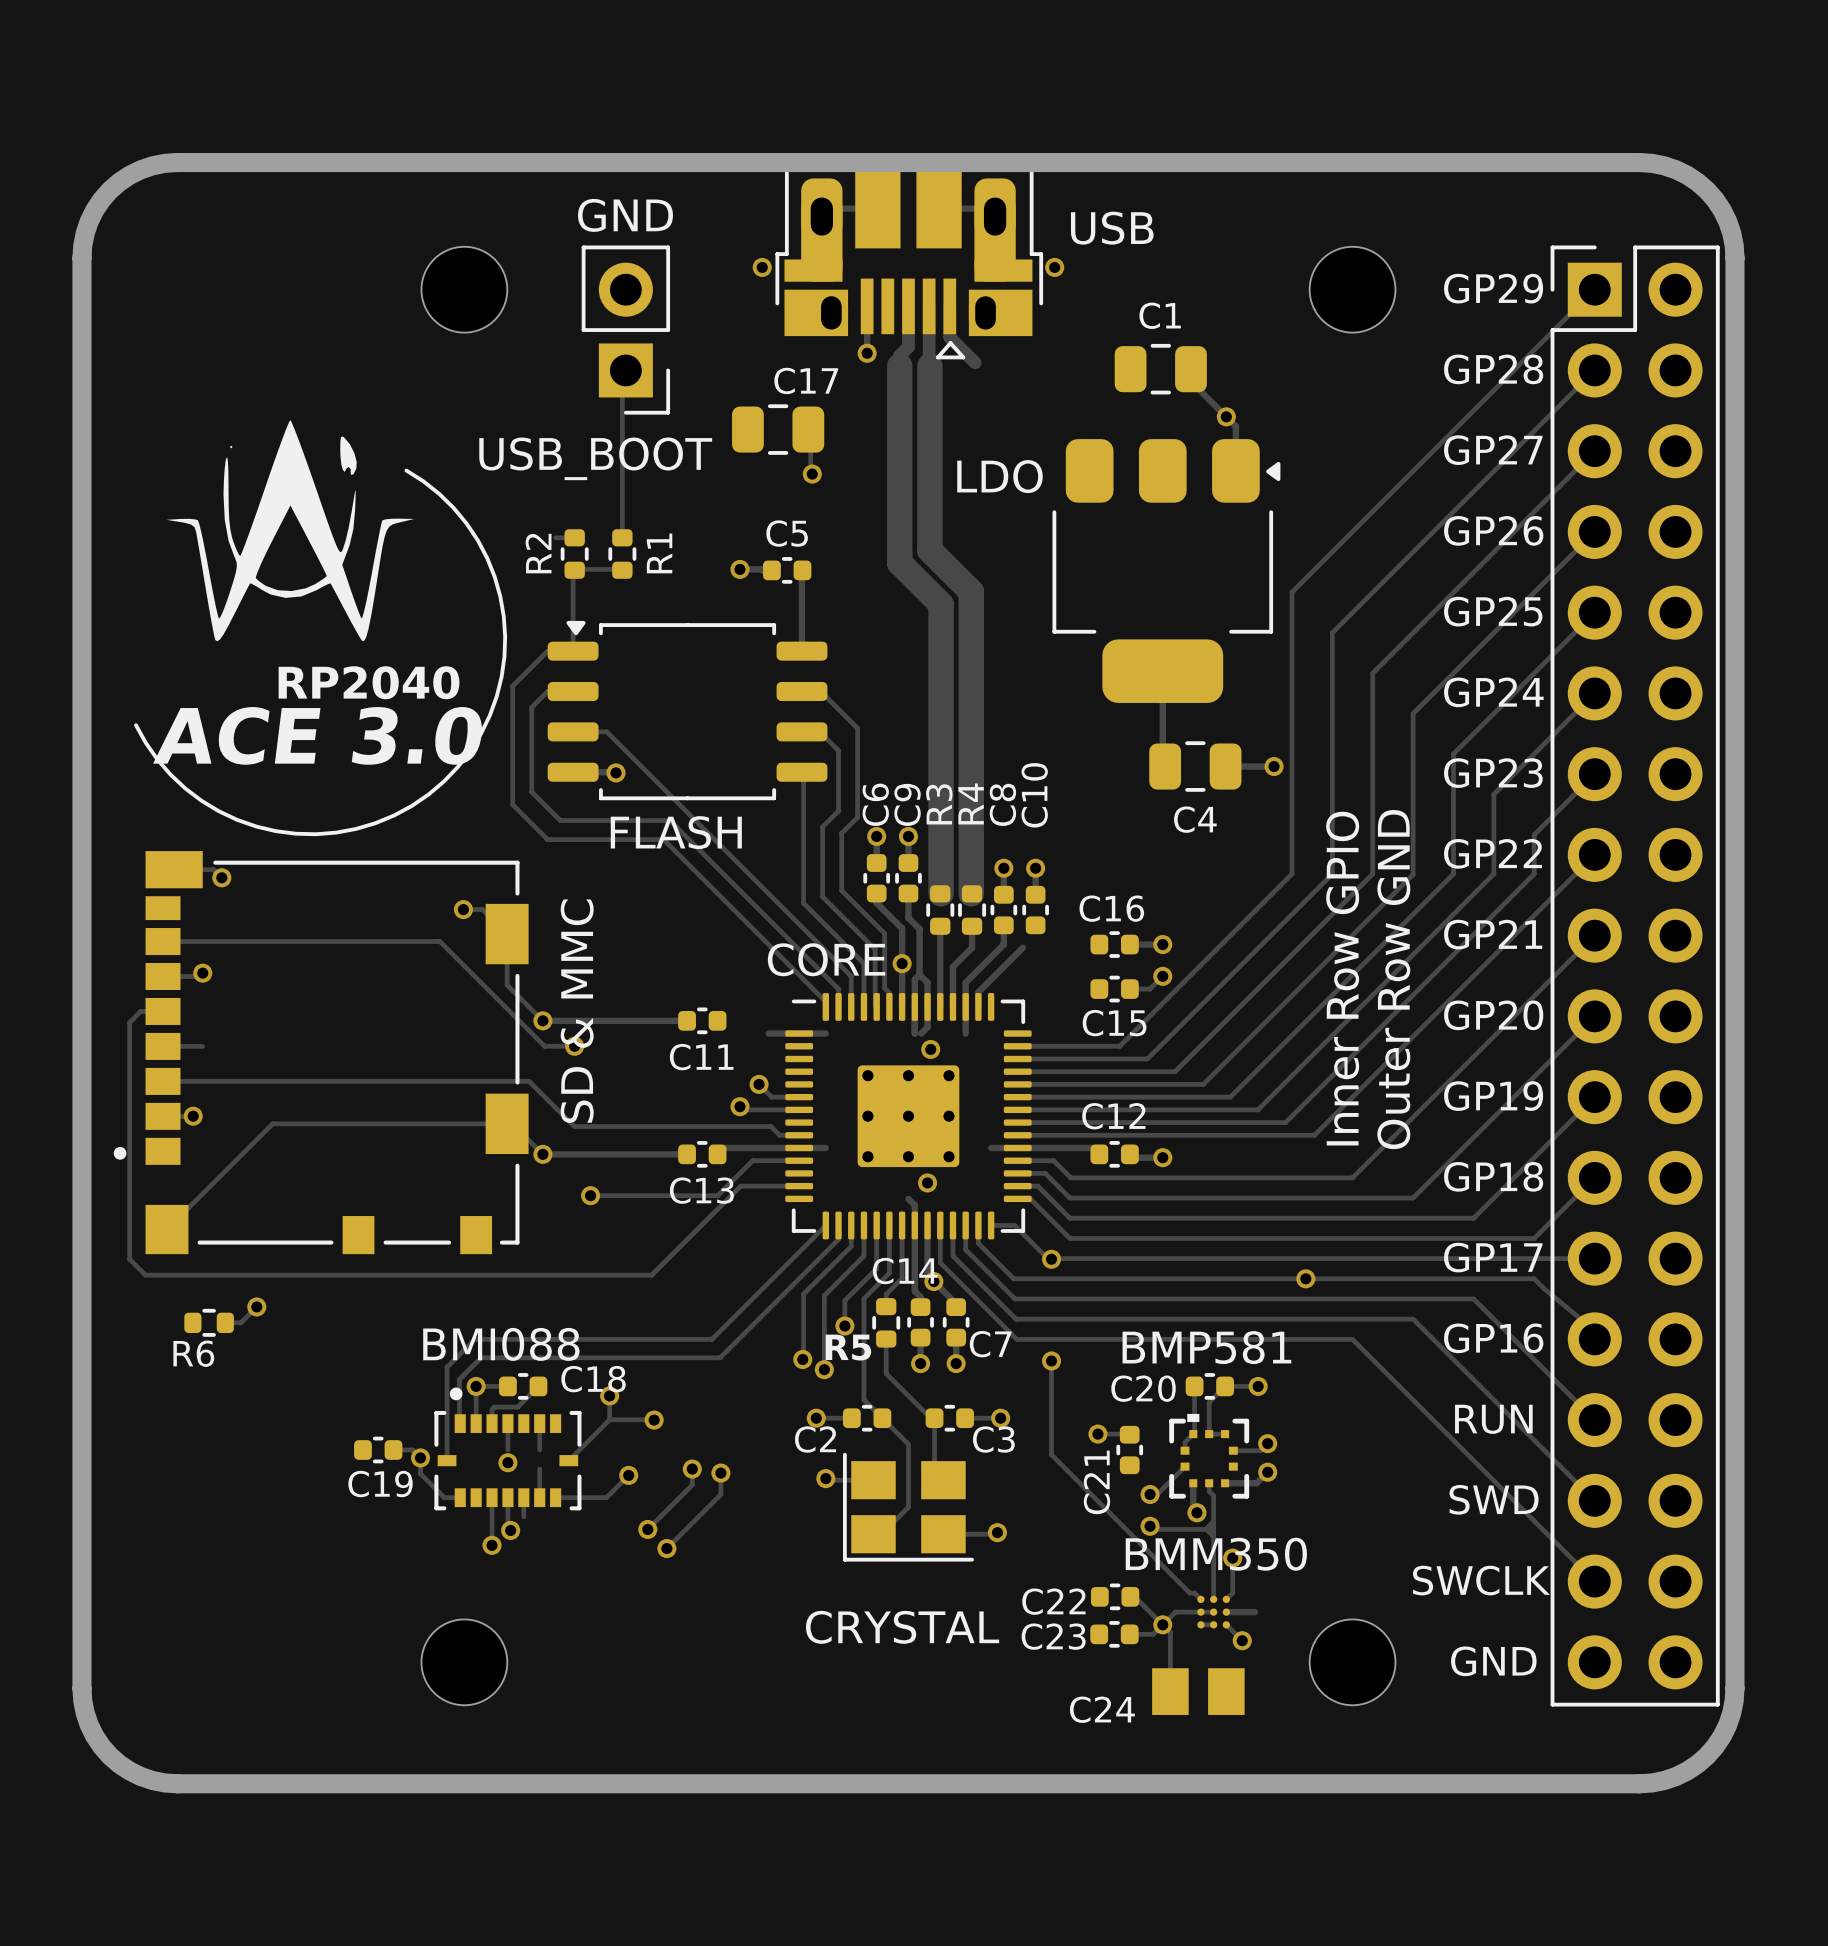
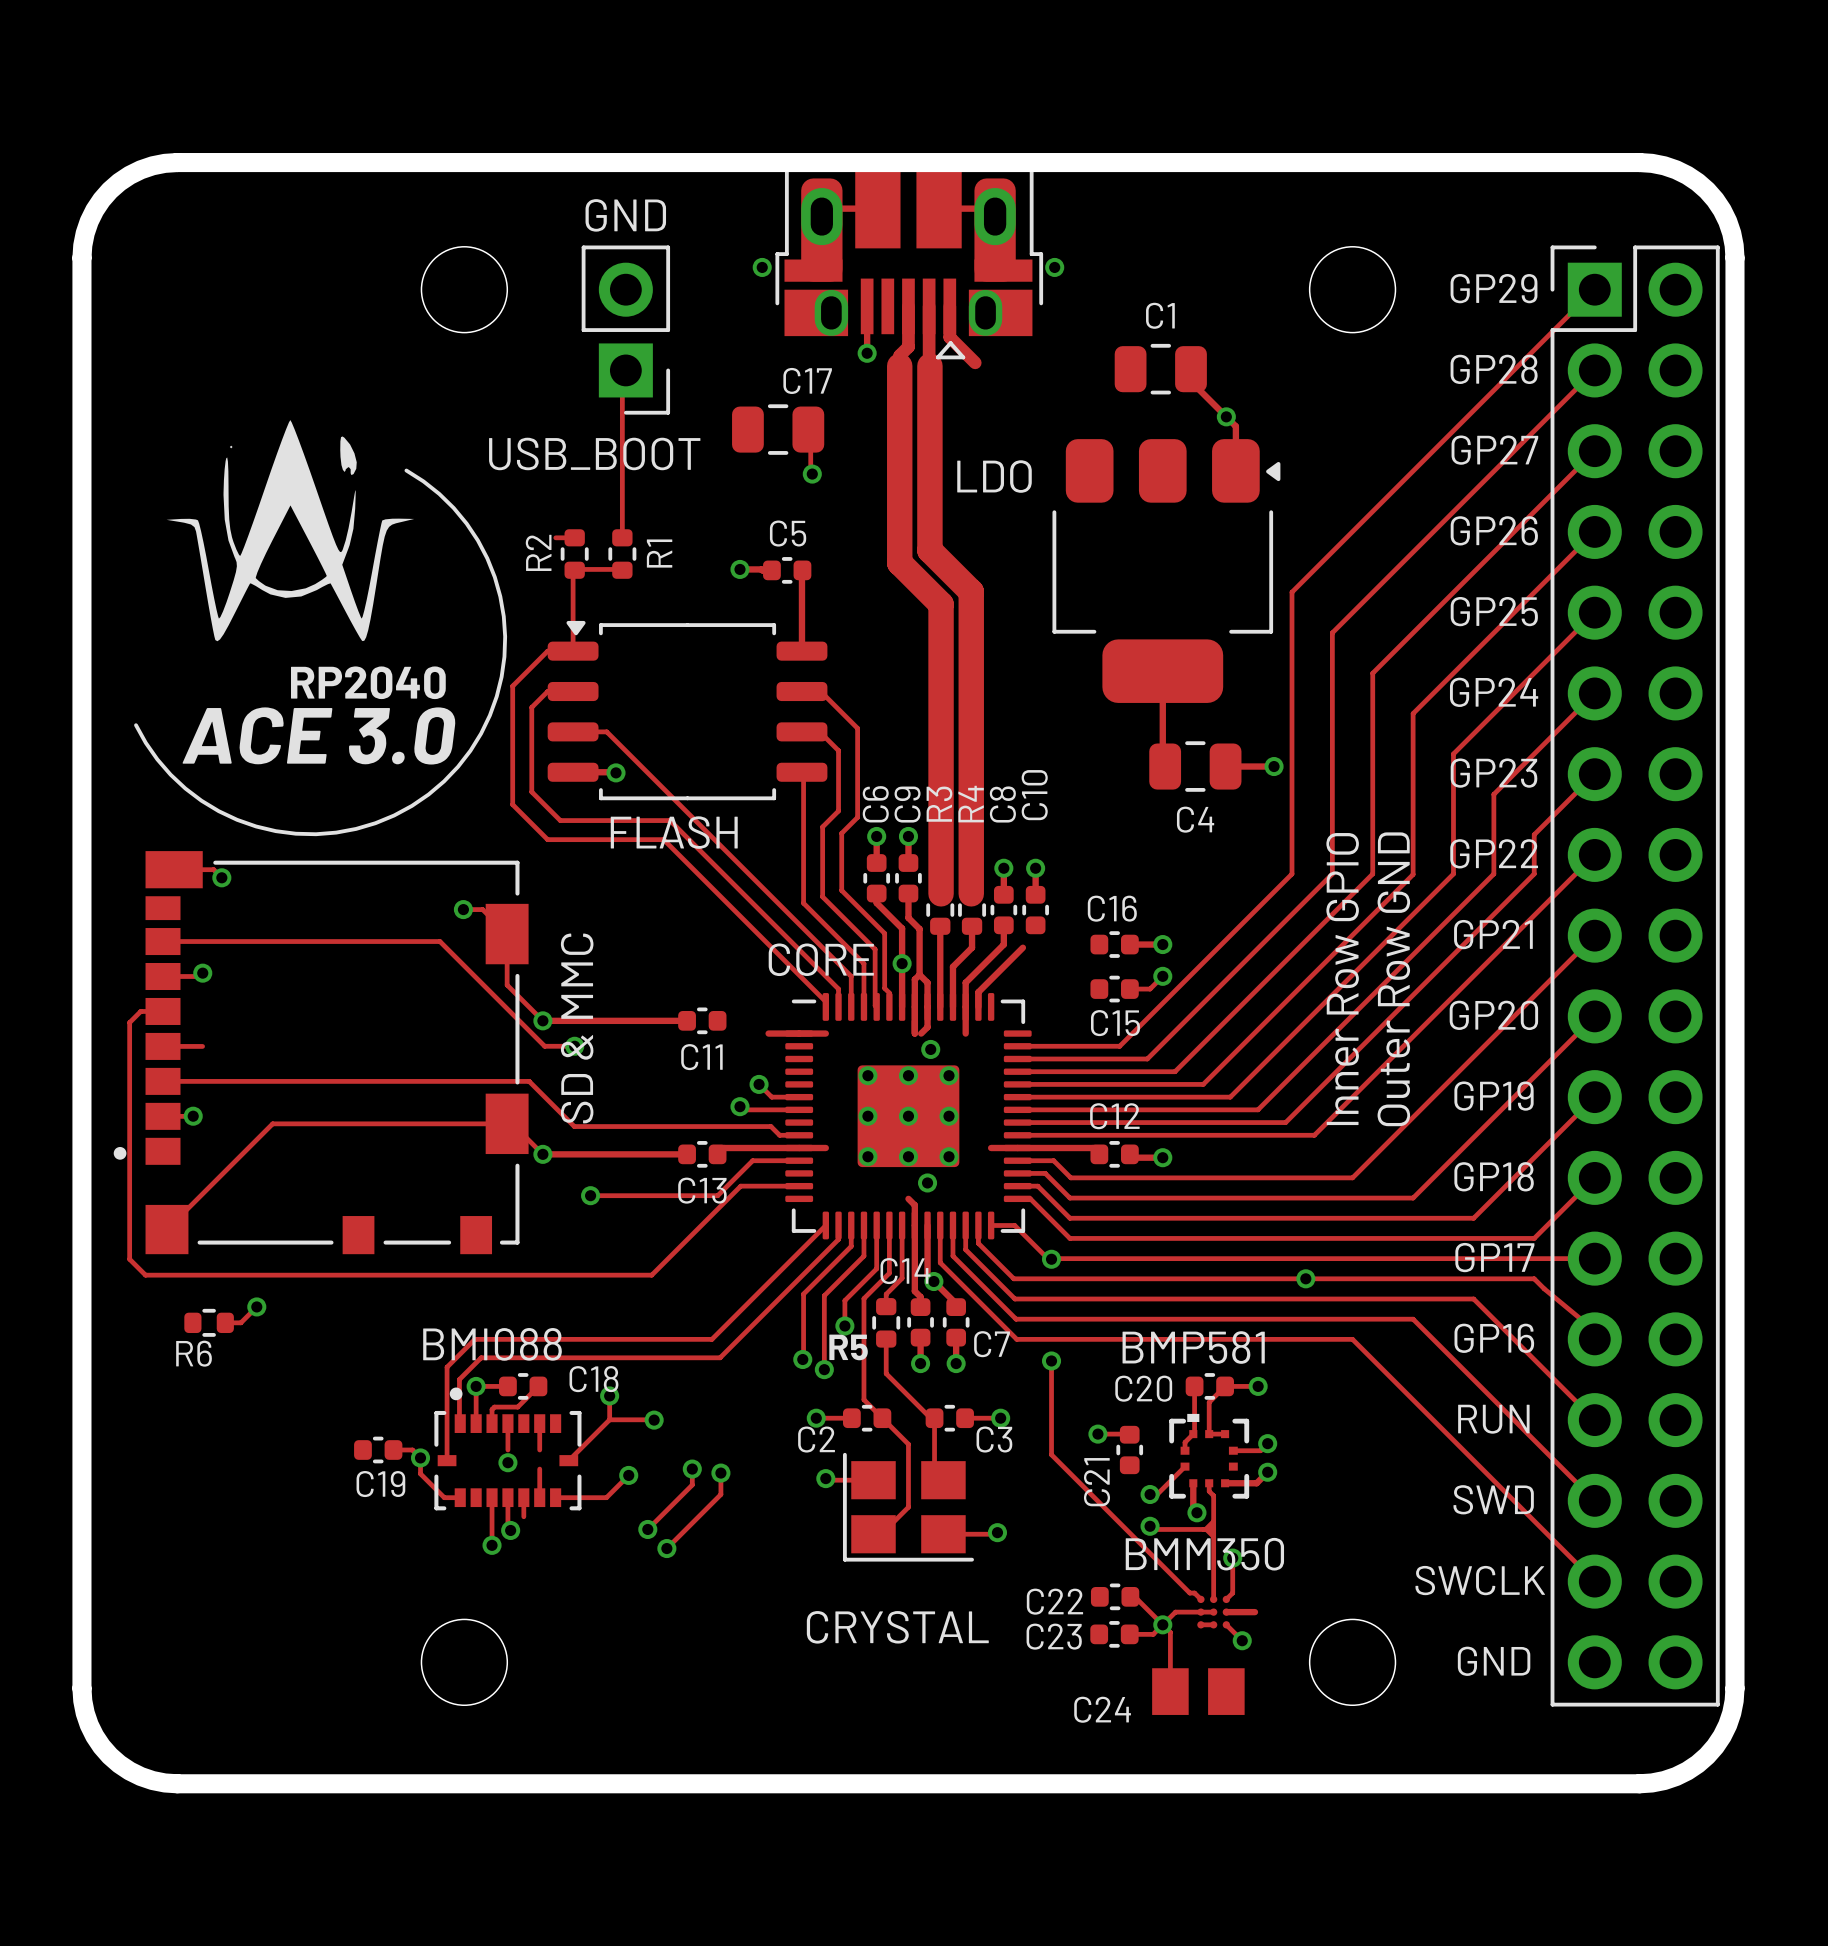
USB name: USB (1112, 228) -> none

